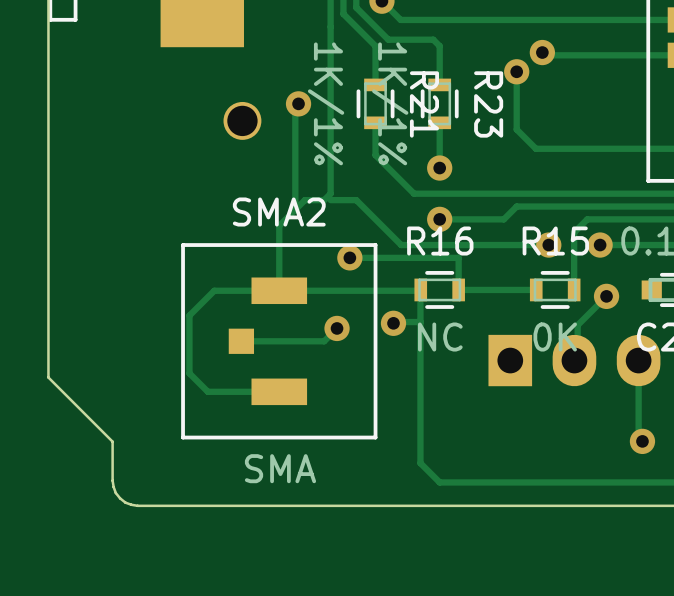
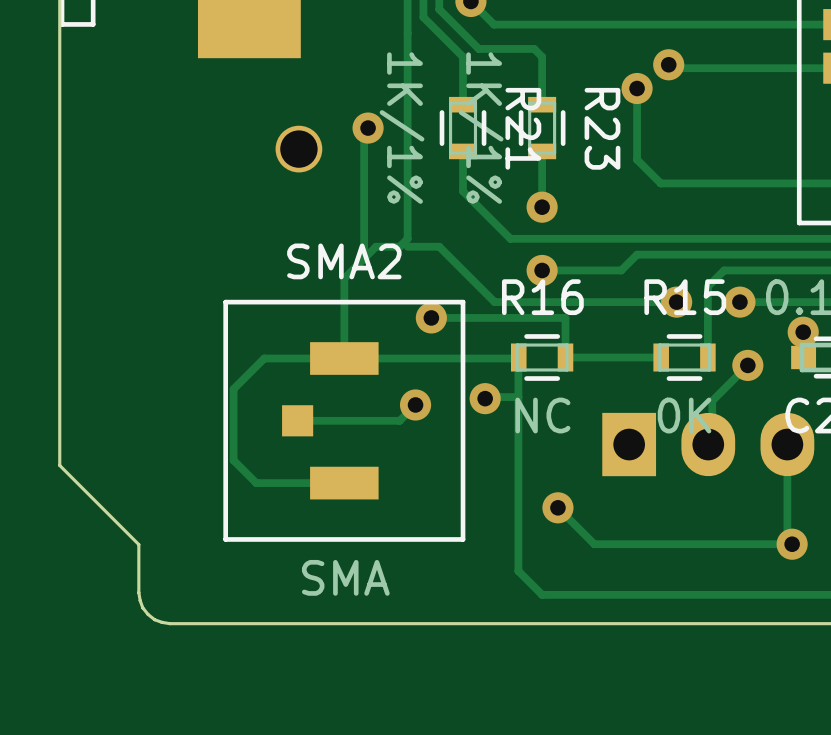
via: none -> (803, 332)
track: none -> (557, 507) (594, 544) (792, 544)
via: none -> (557, 507)

